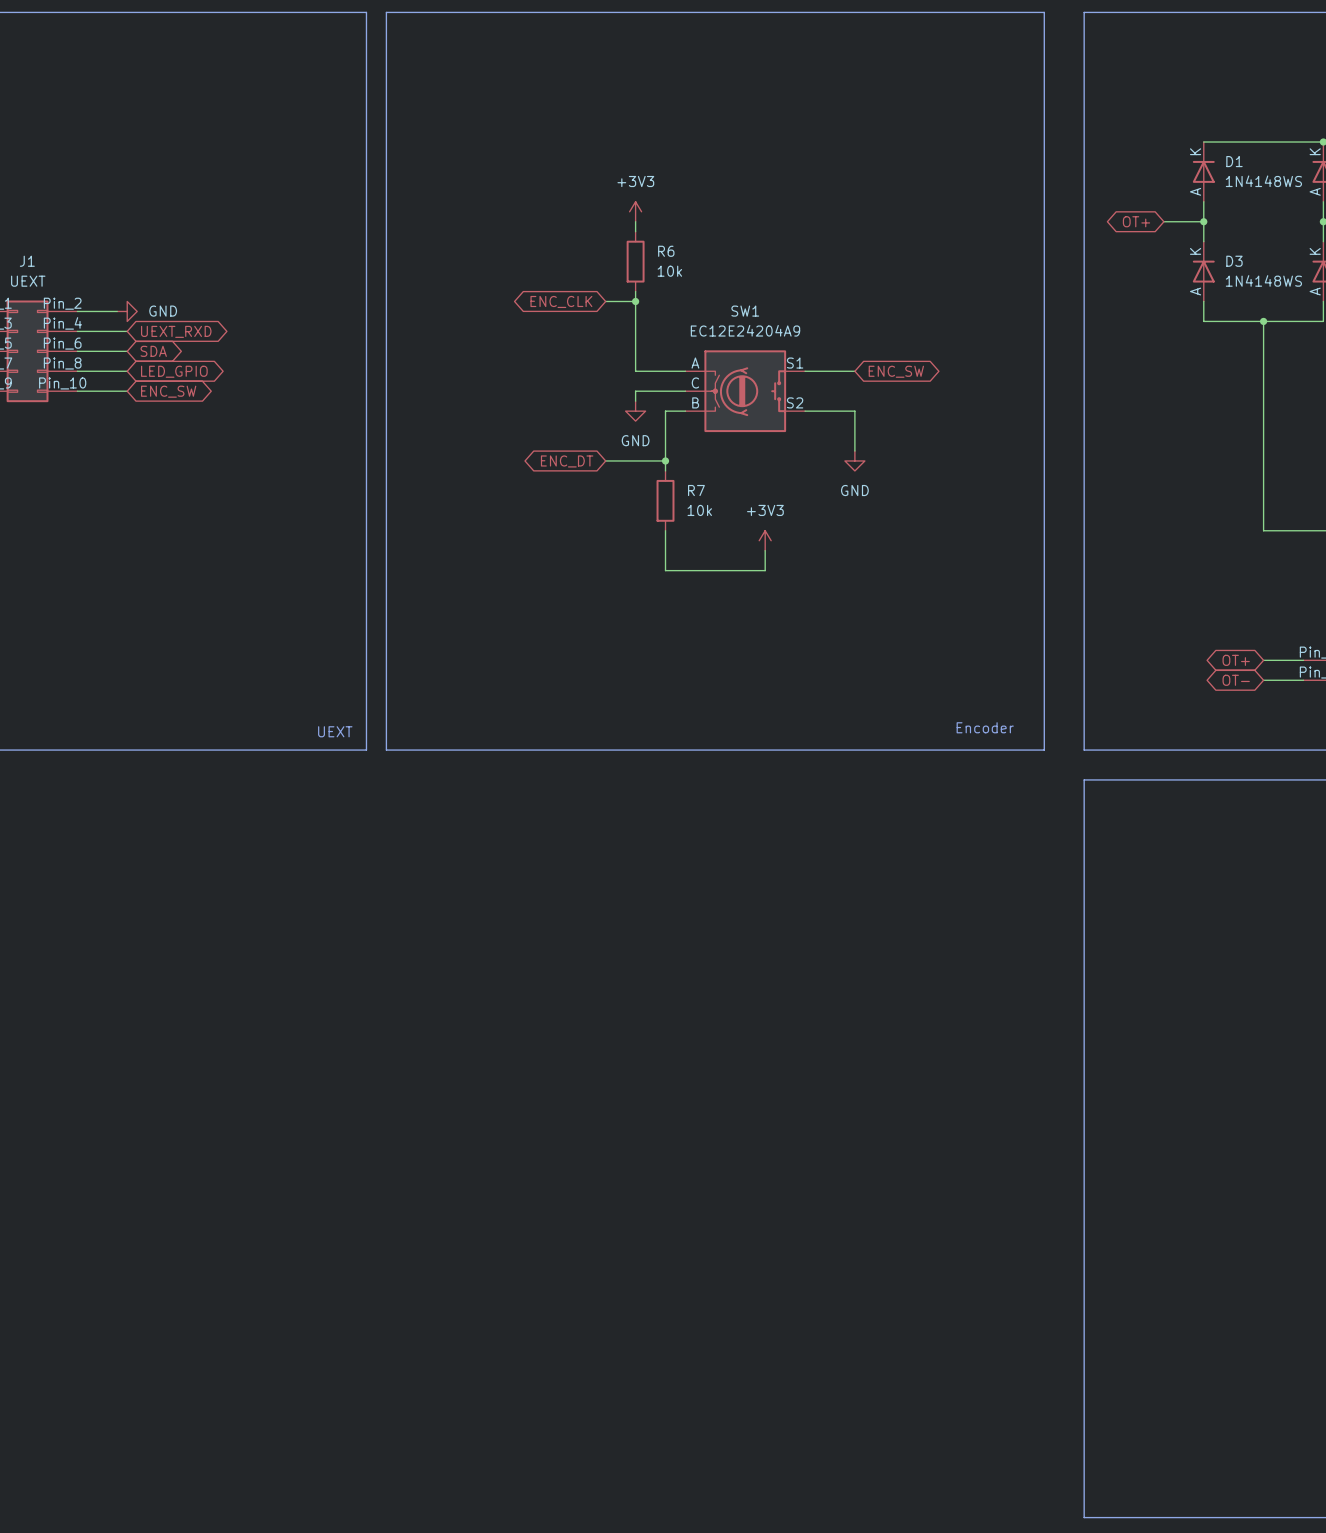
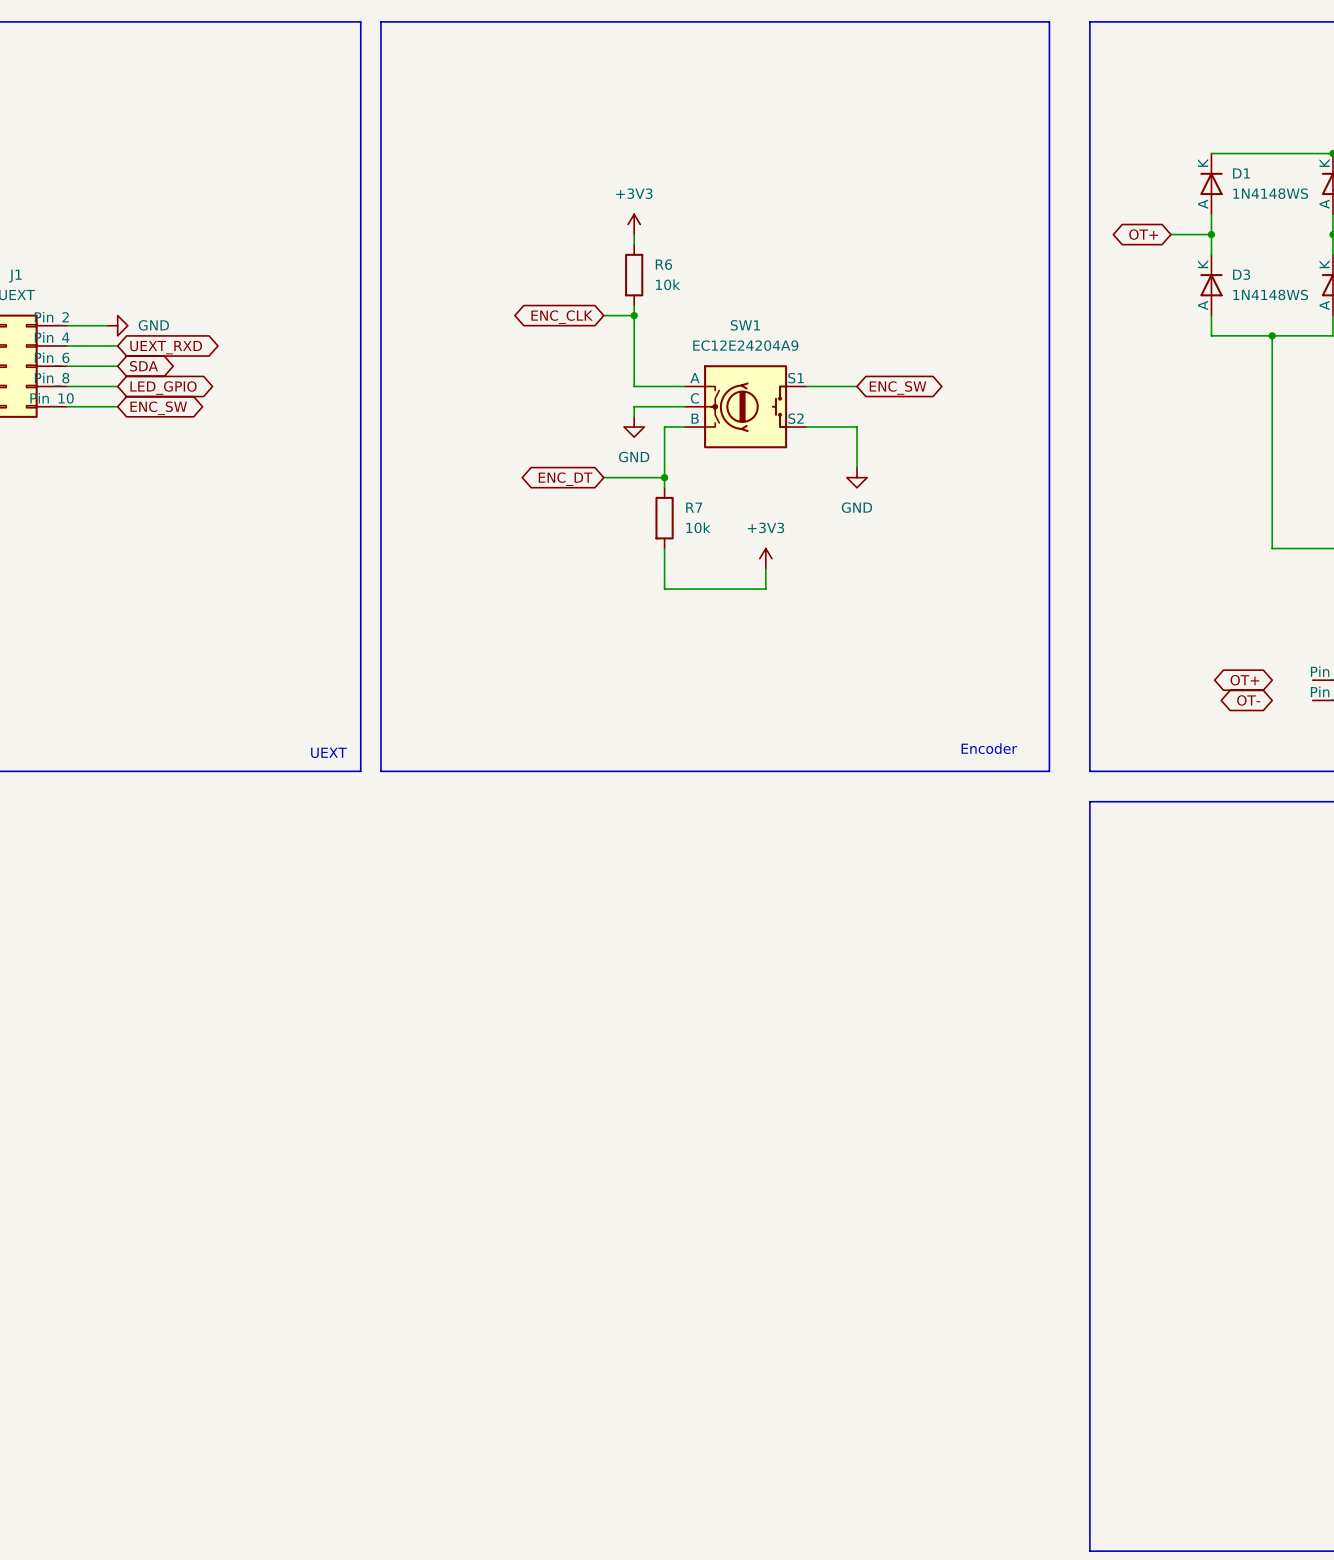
wire: (1263, 660) (1303, 660) -> none
wire: (1263, 680) (1303, 680) -> none

